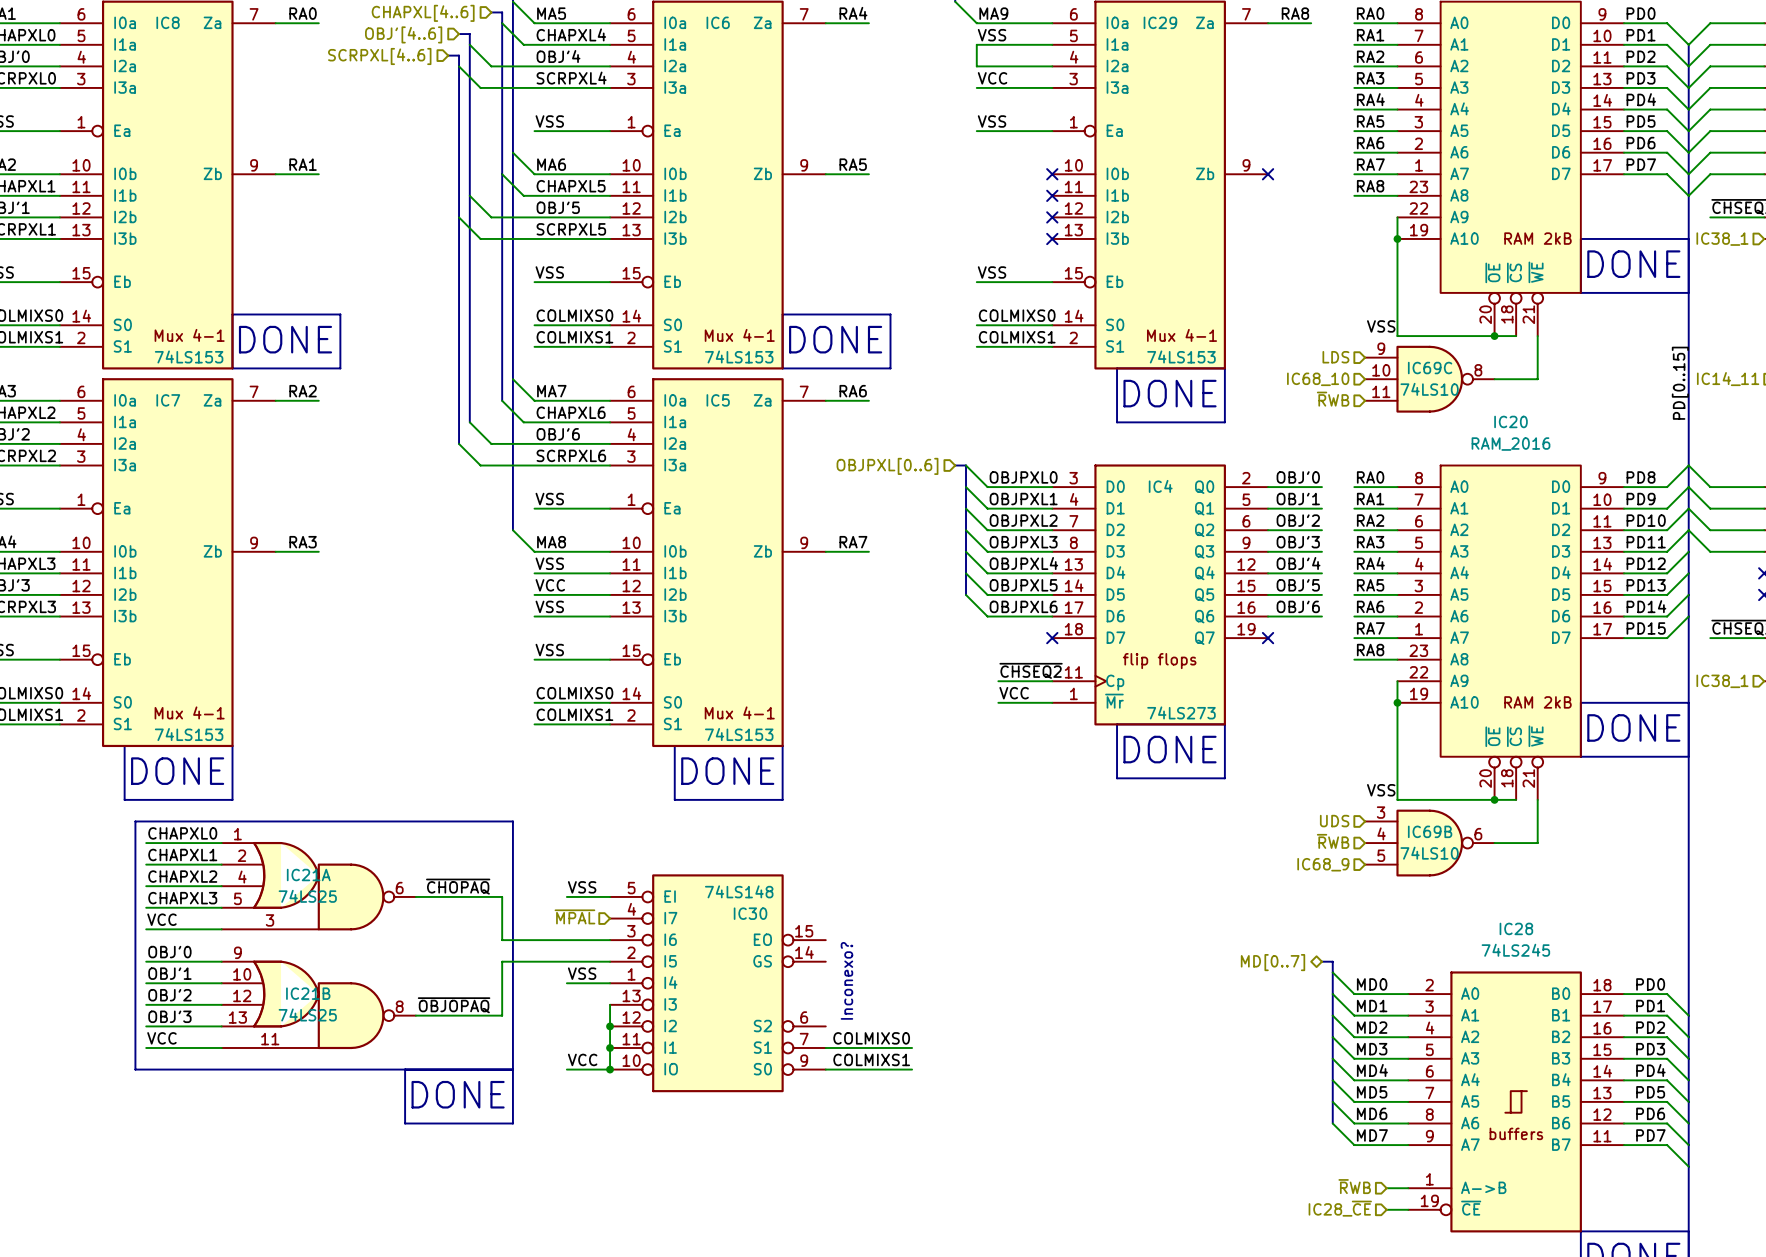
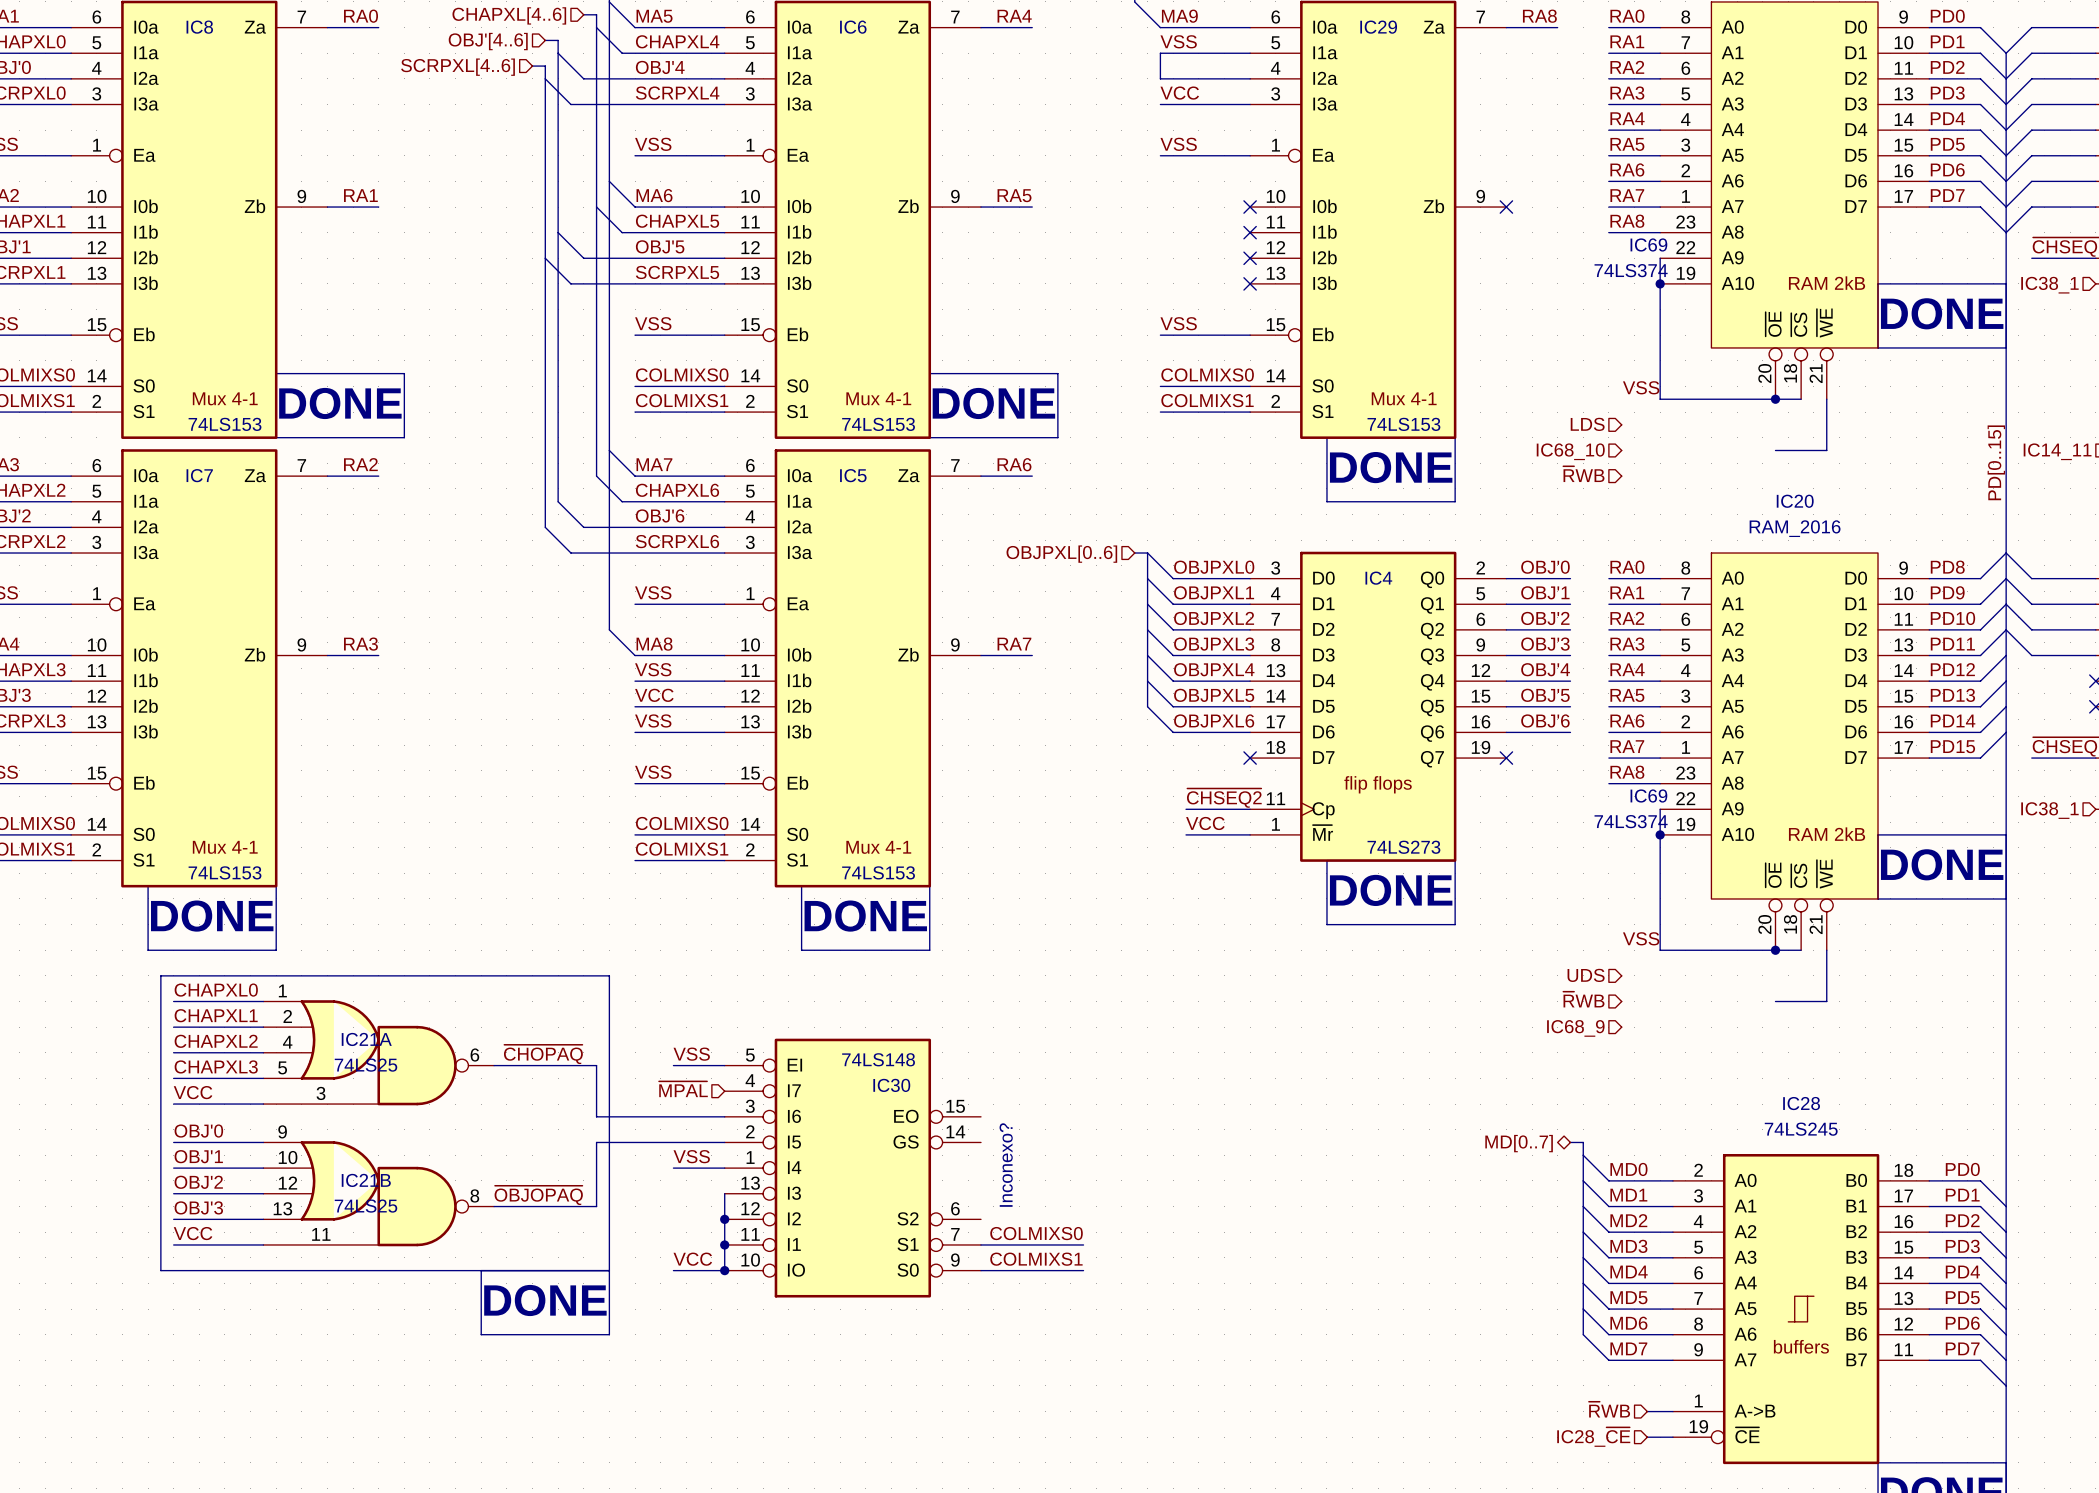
IC69: none -> 74LS374 (1631, 257)
IC69C: 74LS10 (1429, 379) -> none
IC69: none -> 74LS374 (1631, 808)
IC69B: 74LS10 (1429, 843) -> none

